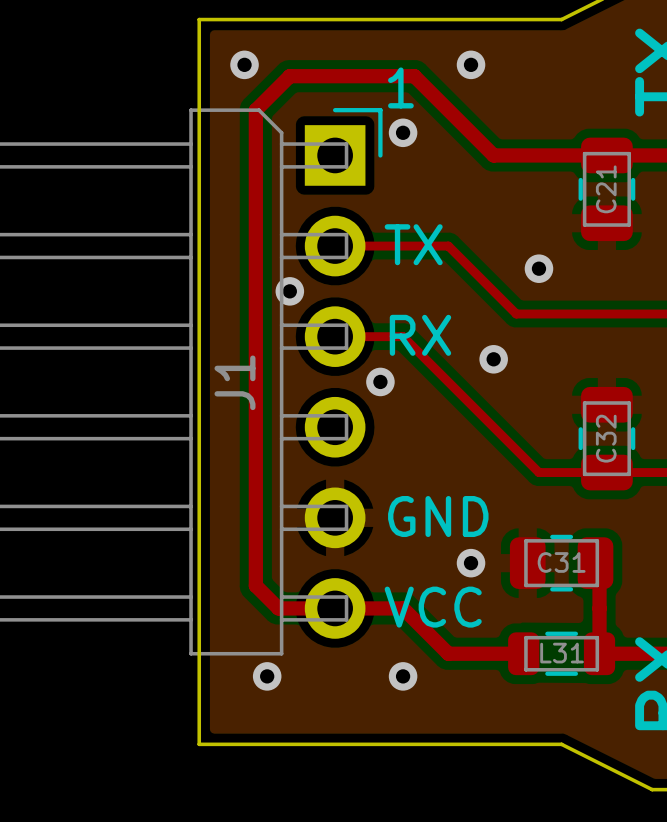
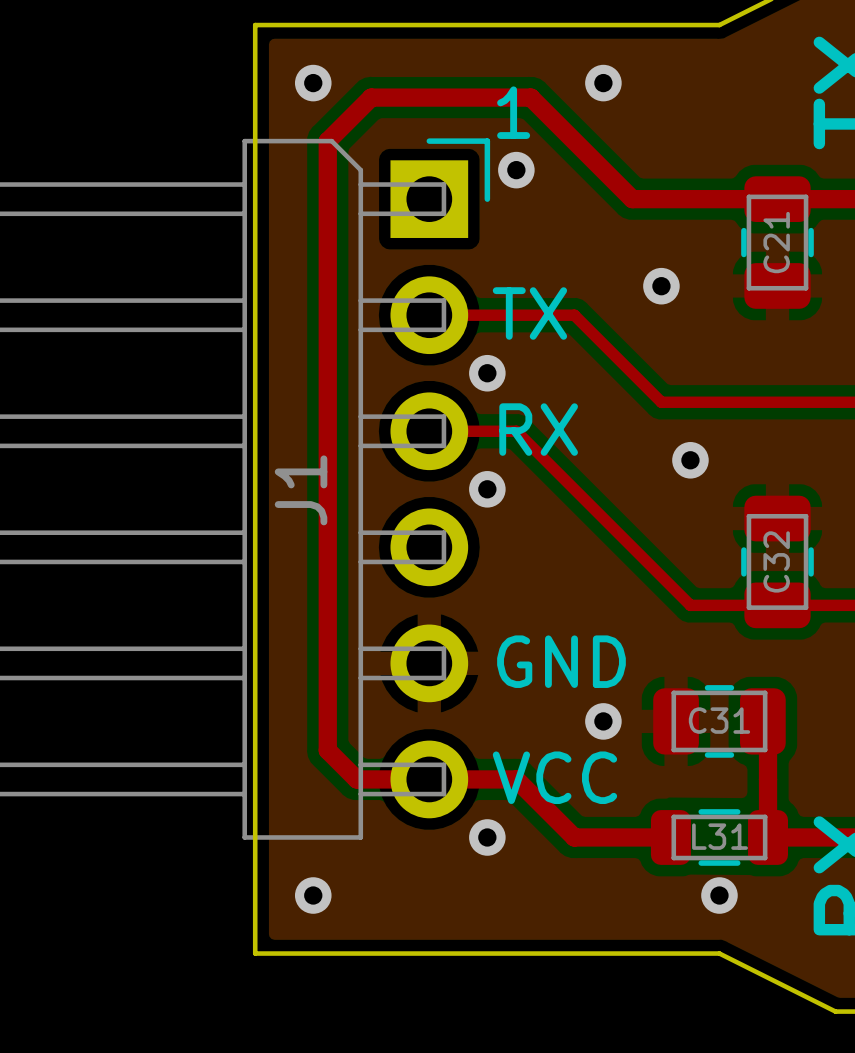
via: none -> (661, 286)
via: (538, 268) -> none
via: (289, 291) -> none
via: none -> (487, 373)
via: (493, 359) -> none
via: none -> (690, 460)
via position: (267, 676) -> (313, 895)
via position: (403, 676) -> (487, 837)
via: none -> (719, 895)

